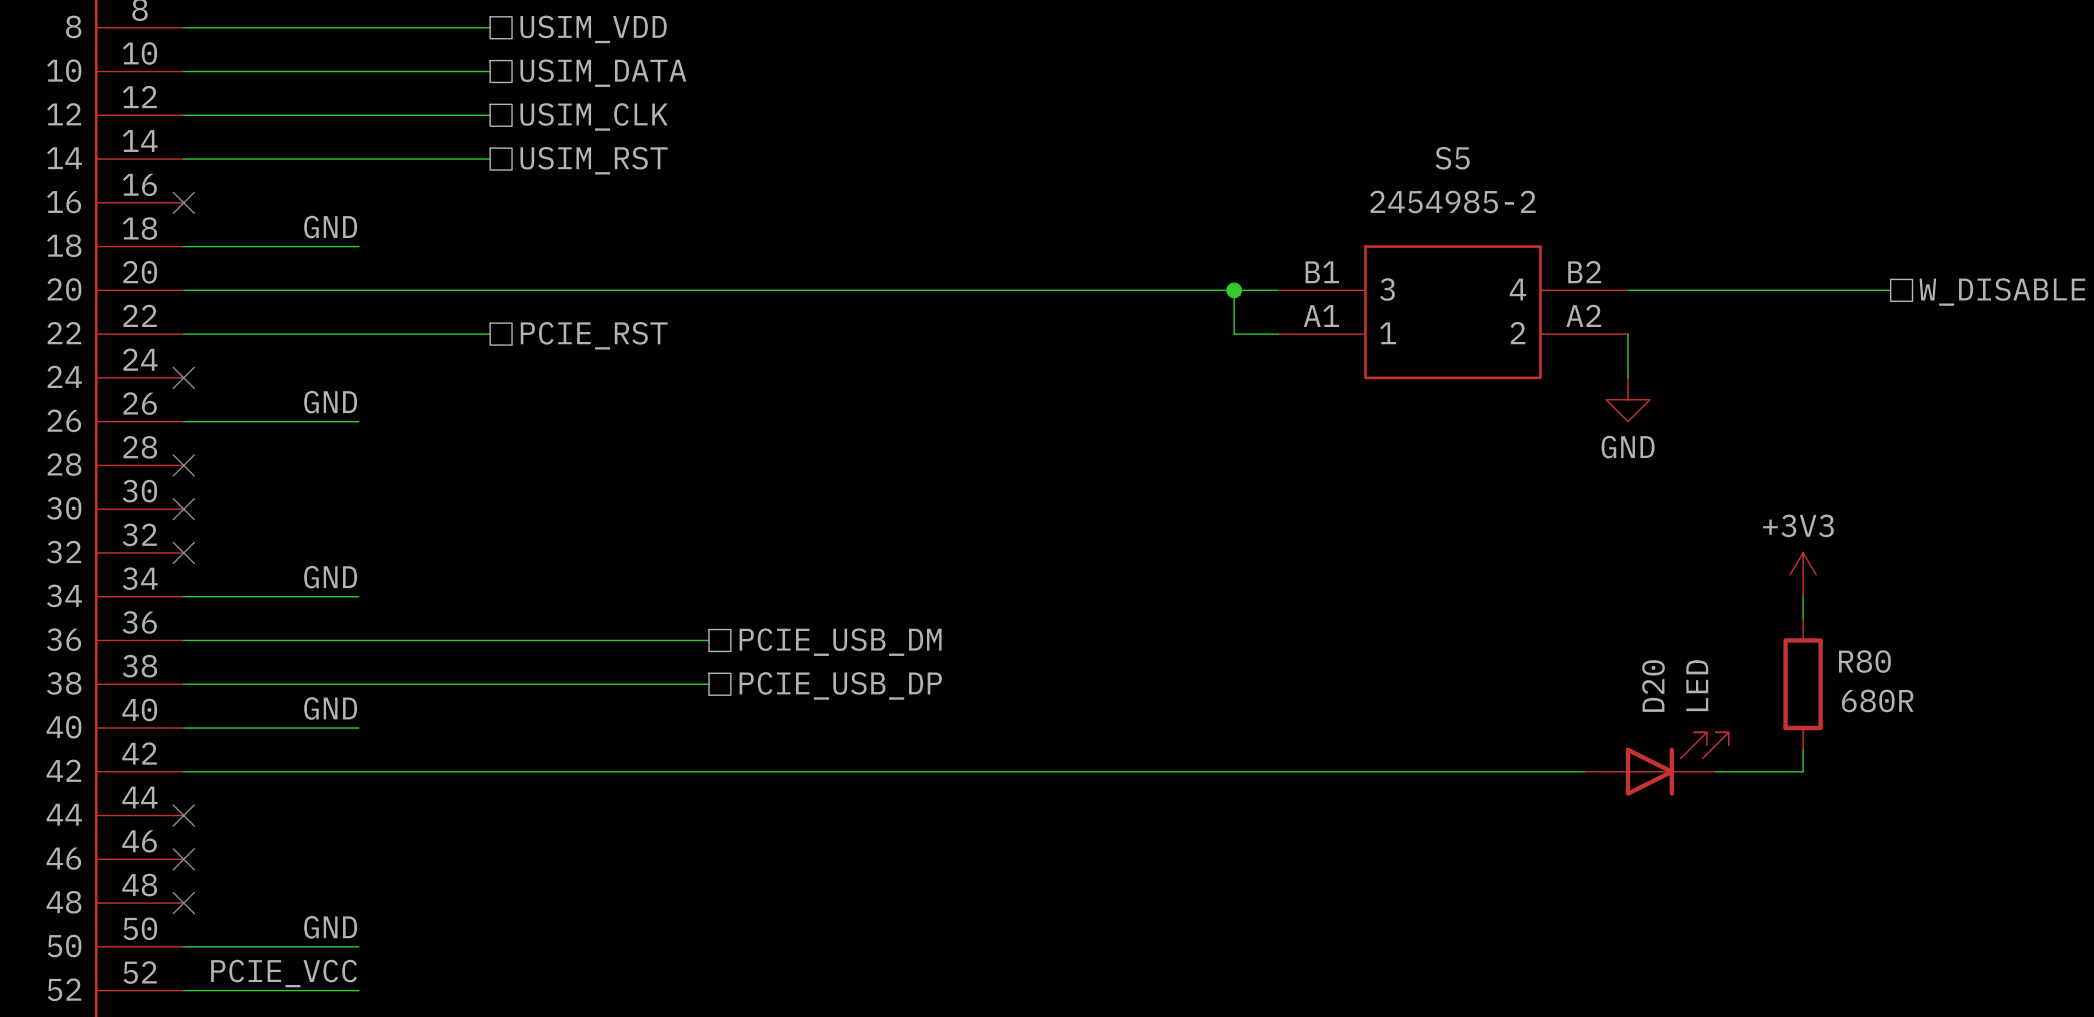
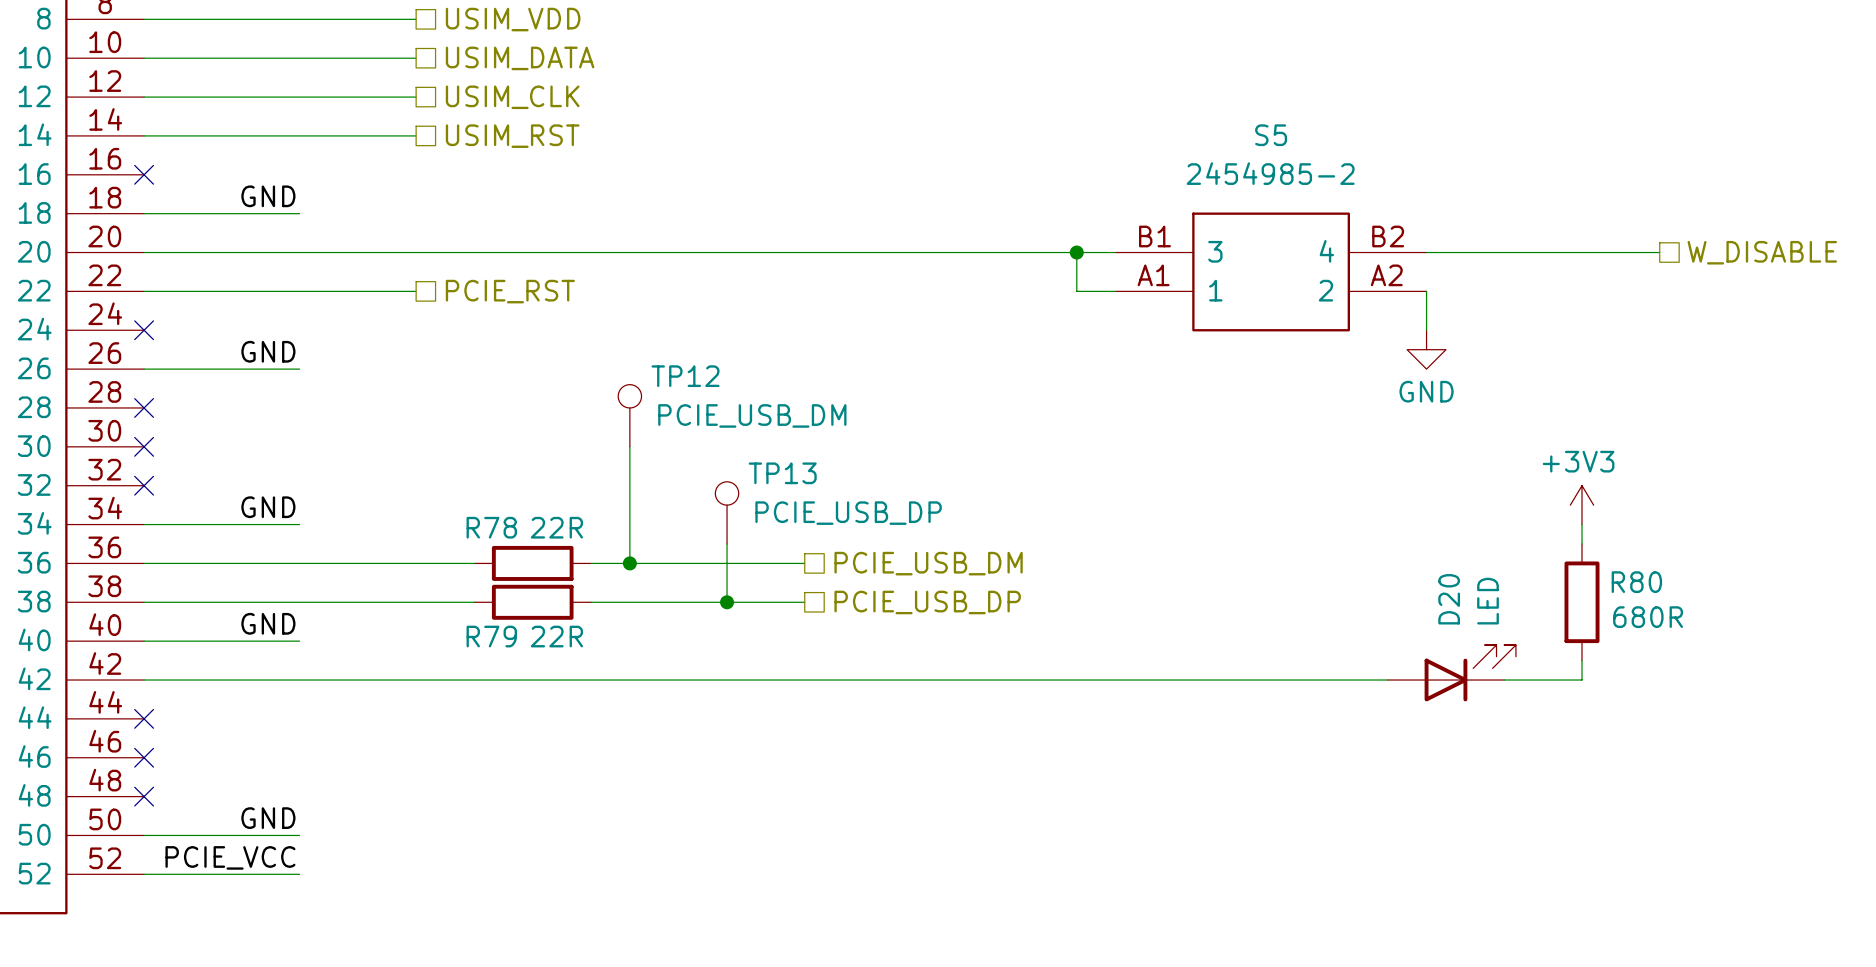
TP12: none -> PCIE_USB_DM (629, 415)
wire: none -> (629, 446) (629, 563)
TP13: none -> PCIE_USB_DP (727, 512)
wire: none -> (727, 543) (727, 602)
wire: (555, 640) (687, 640) -> none
R78: none -> 22R (532, 563)
wire: none -> (610, 563) (804, 563)
junction: none -> (629, 563)
hierarchical label position: PCIE_USB_DM (840, 642) -> PCIE_USB_DM (928, 563)
wire: (555, 684) (687, 684) -> none
R79: none -> 22R (532, 602)
wire: none -> (610, 602) (804, 602)
junction: none -> (727, 602)
hierarchical label position: PCIE_USB_DP (840, 685) -> PCIE_USB_DP (927, 602)

